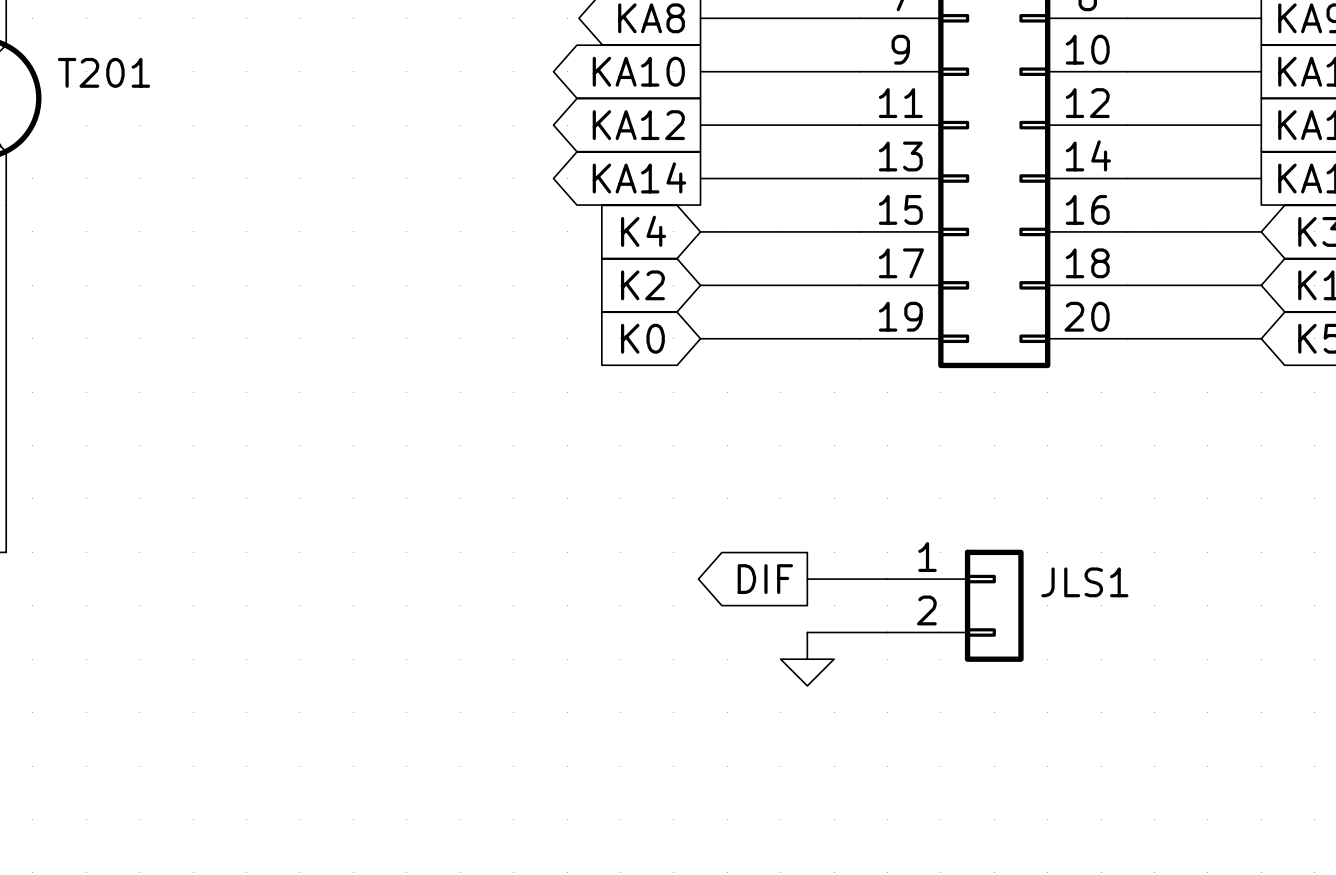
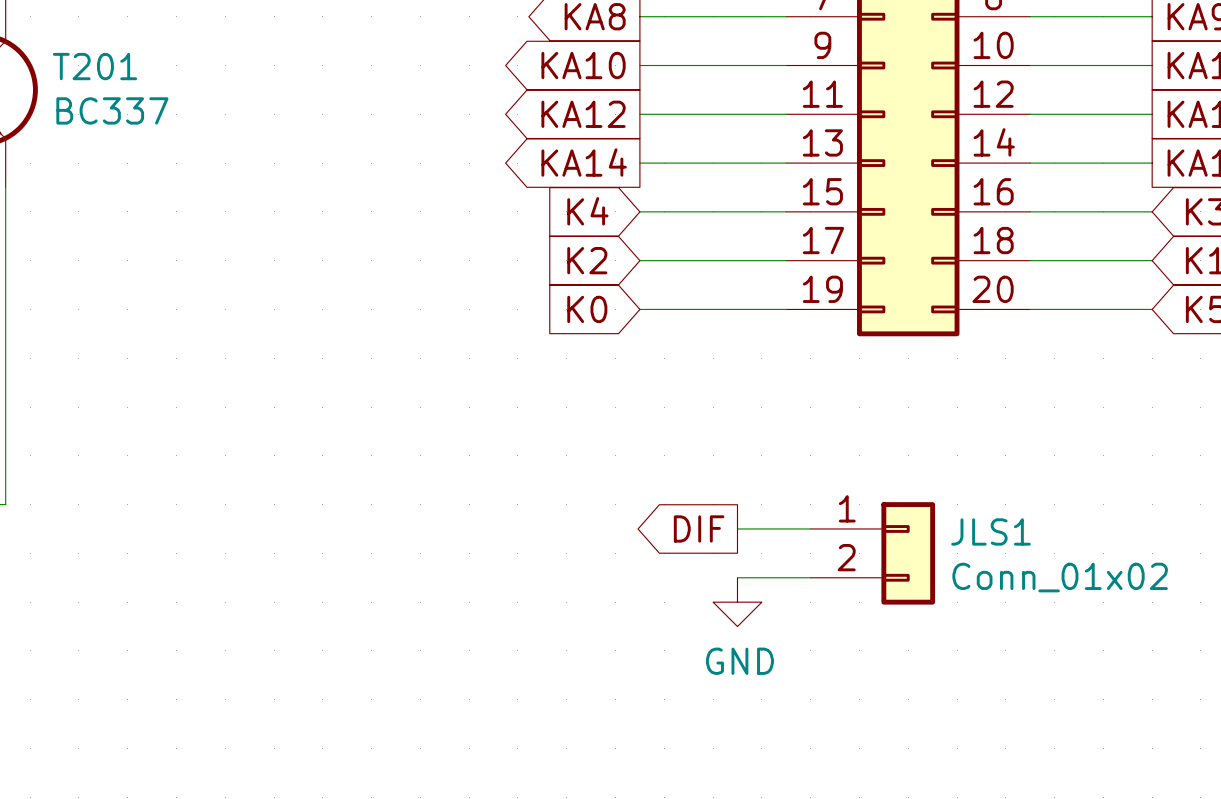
T201 value: none -> BC337 (112, 110)
JLS1 value: none -> Conn_01x02 (1060, 577)
power symbol text: none -> GND (739, 661)

